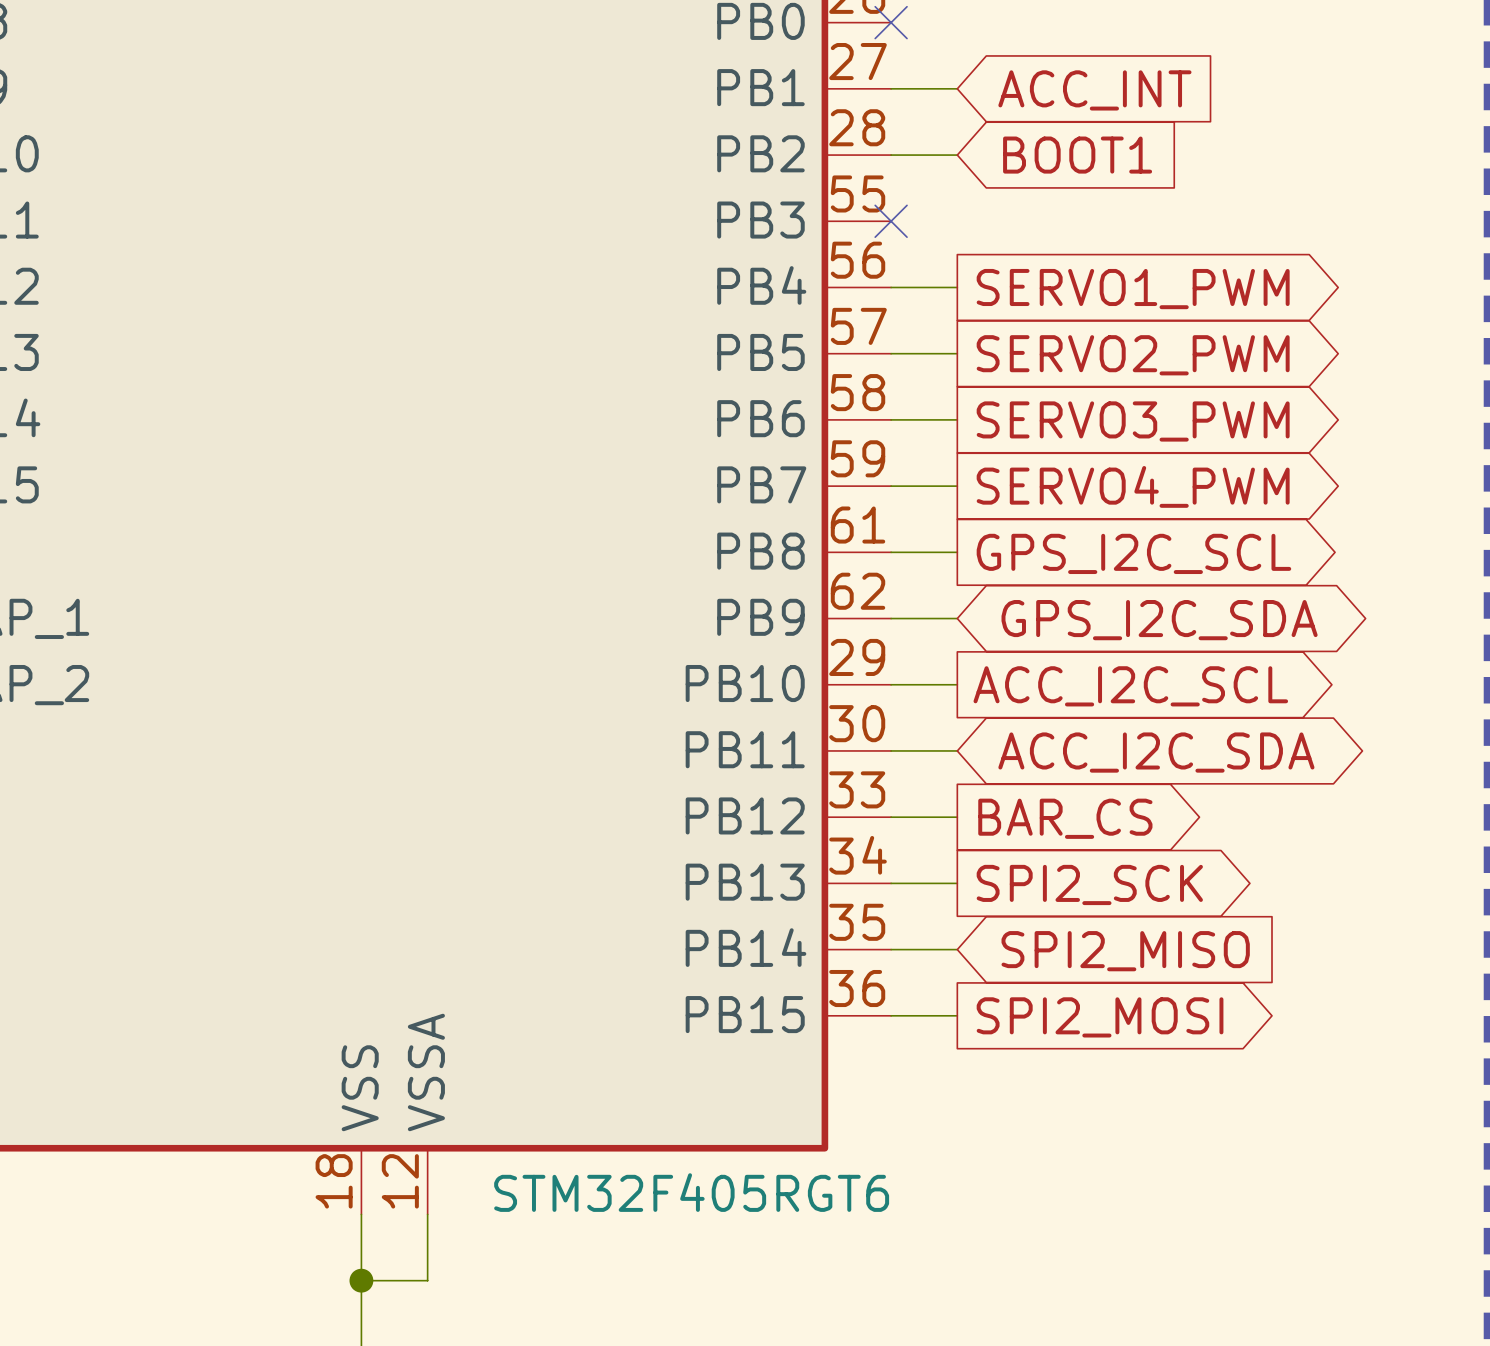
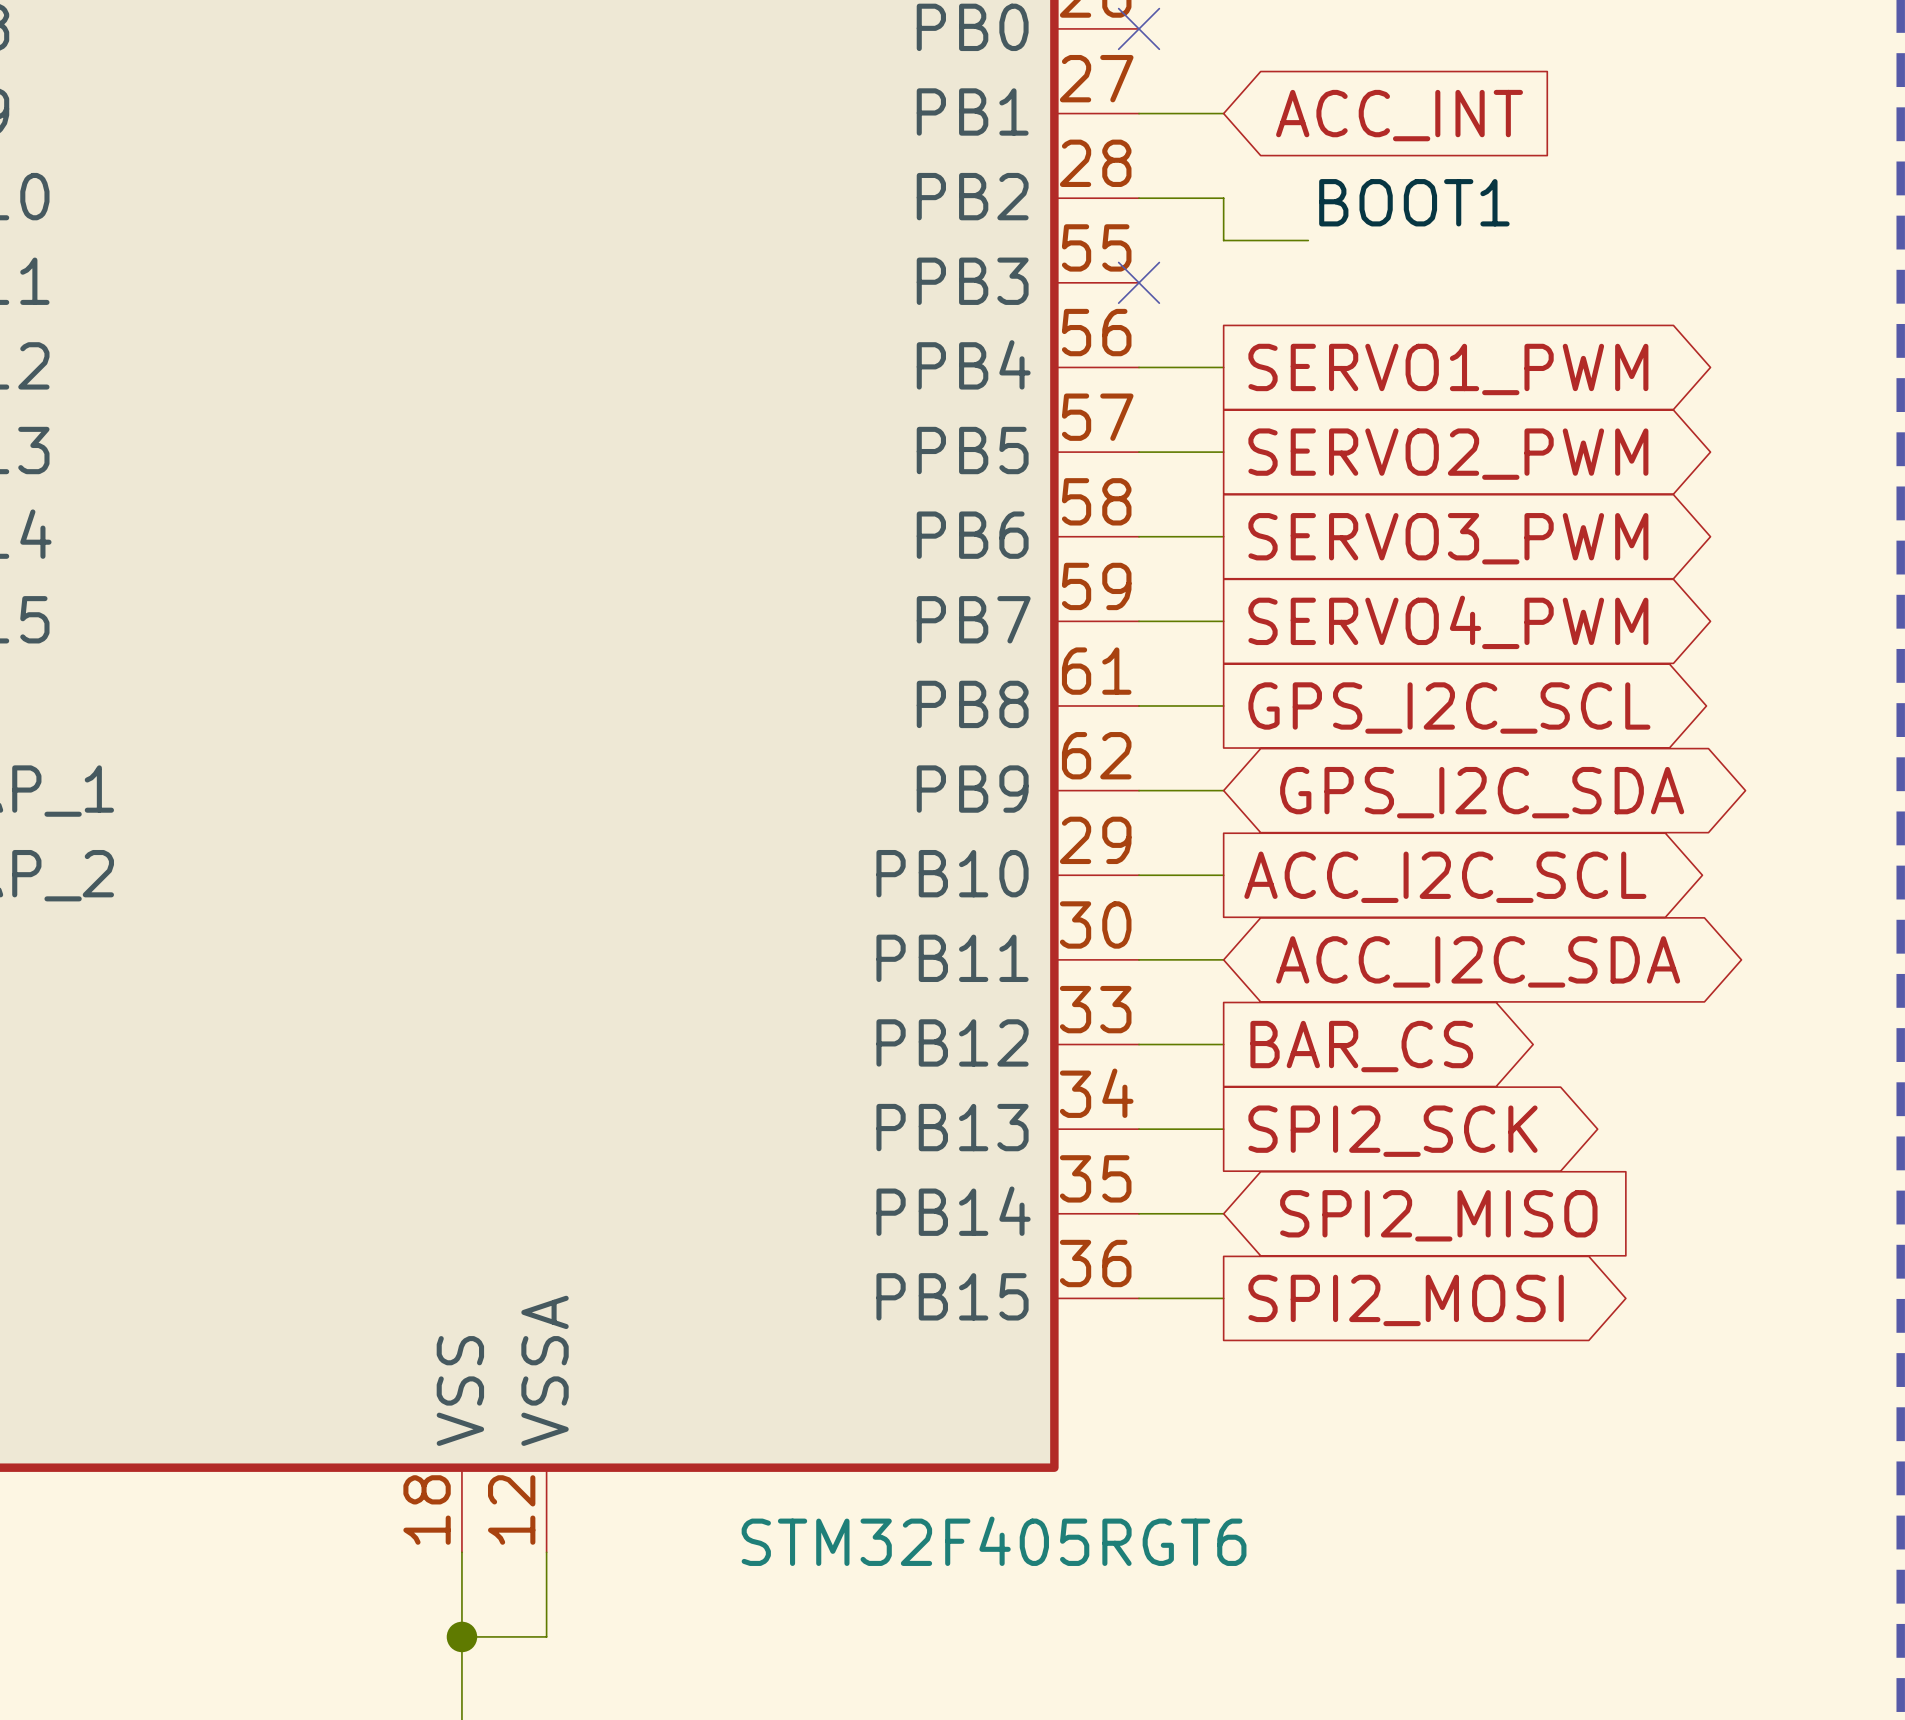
wire: none -> (1223, 198) (1223, 240) (1308, 240)
global label: BOOT1 (1077, 155) -> none
label: none -> BOOT1 (1414, 202)
part value position: STM32F405RGT6 (691, 1192) -> STM32F405RGT6 (994, 1541)

